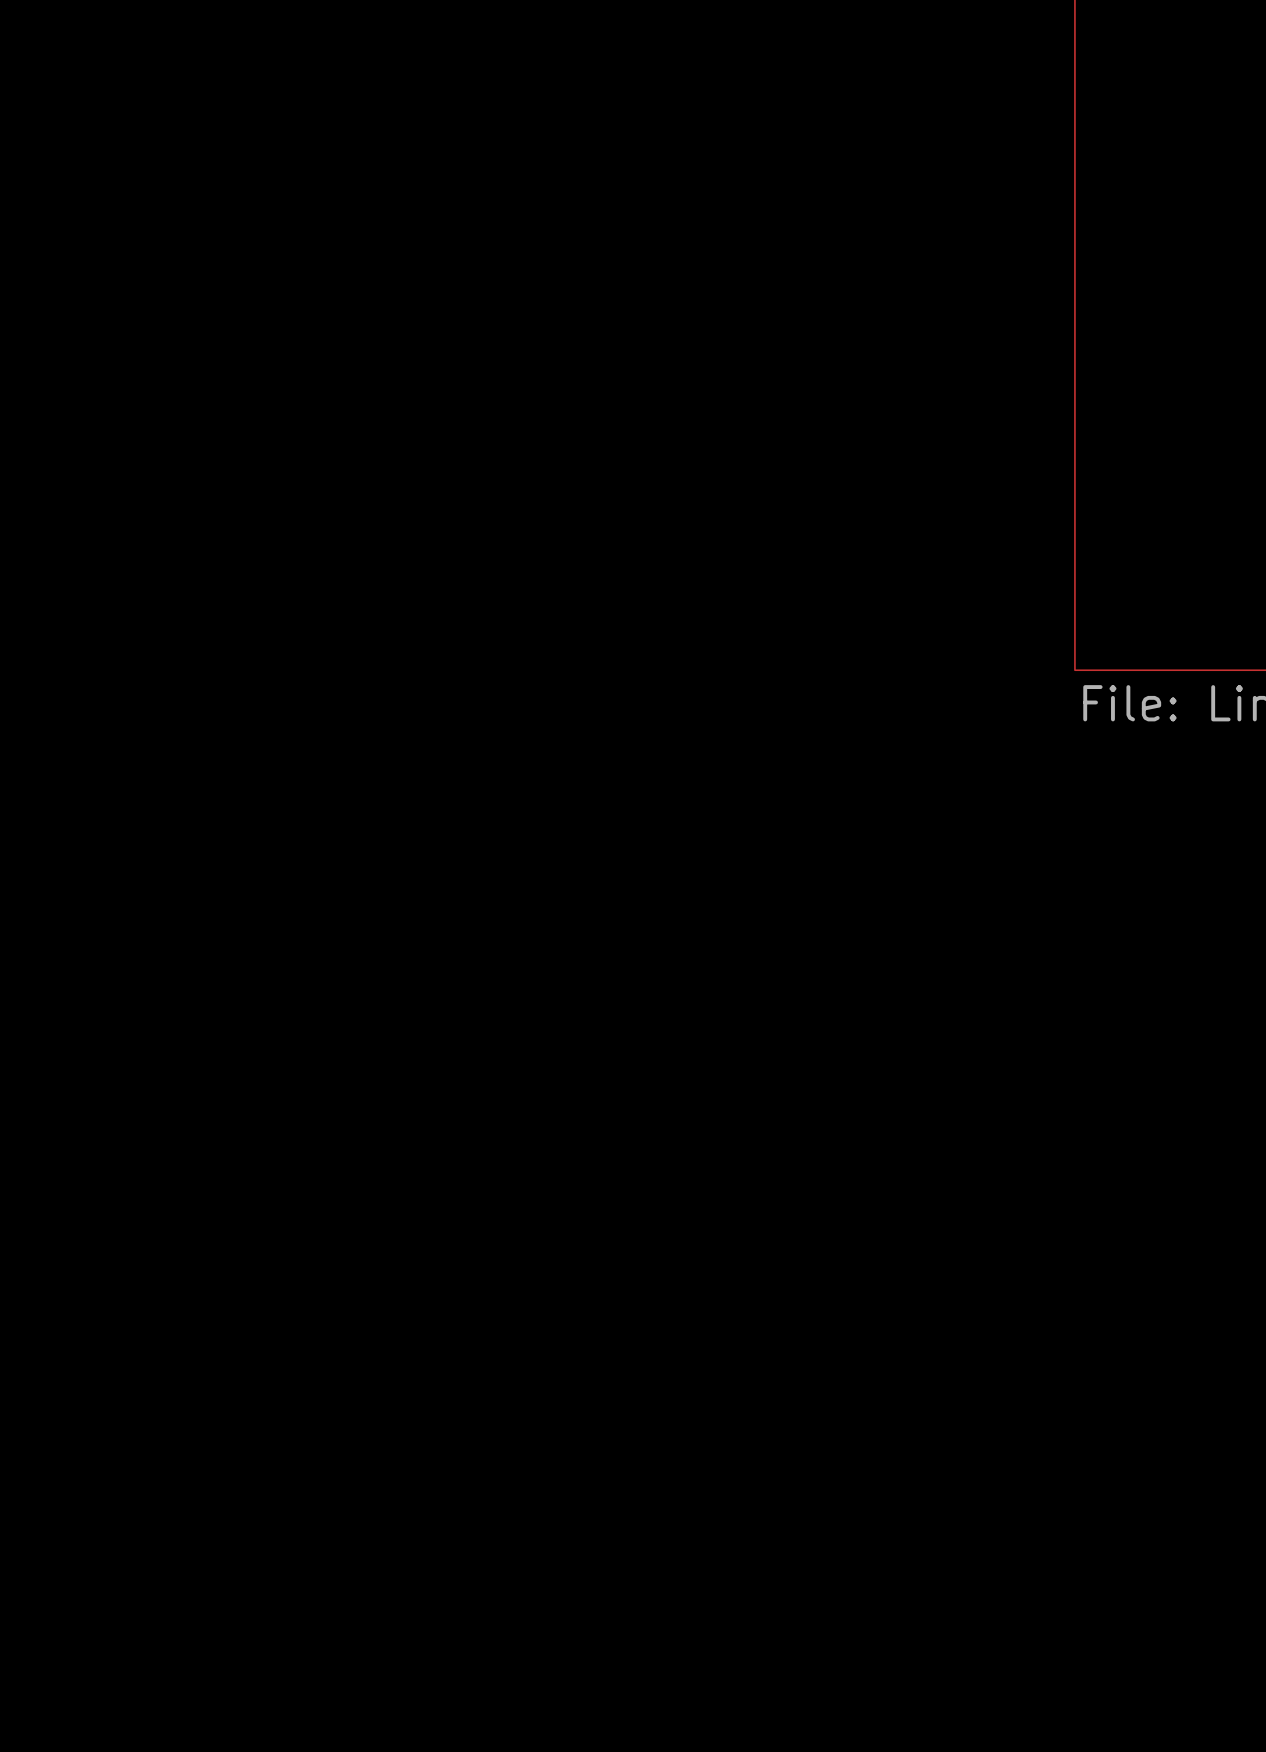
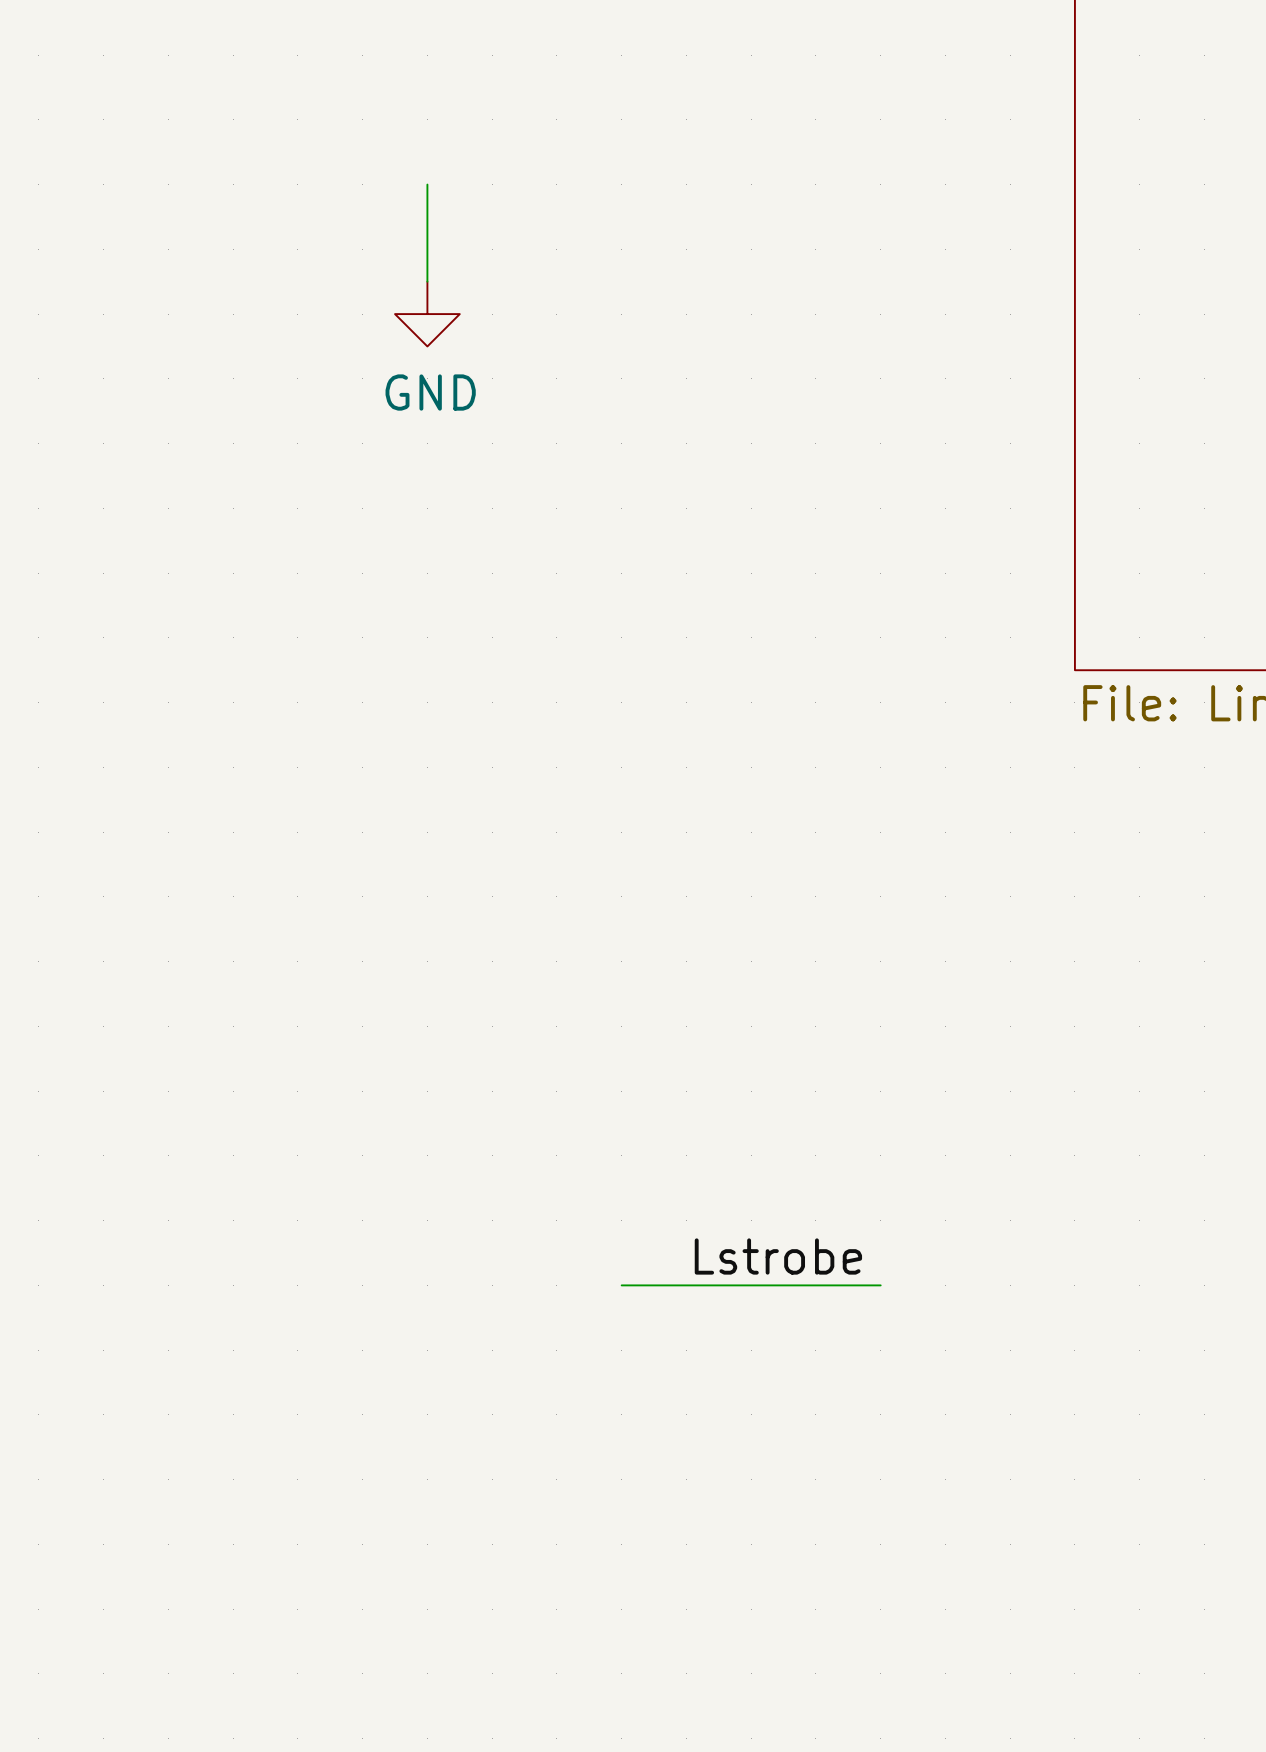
wire: none -> (427, 184) (427, 281)
power symbol: none -> GND (427, 314)
label: none -> Lstrobe (778, 1256)
wire: none -> (621, 1285) (880, 1285)

